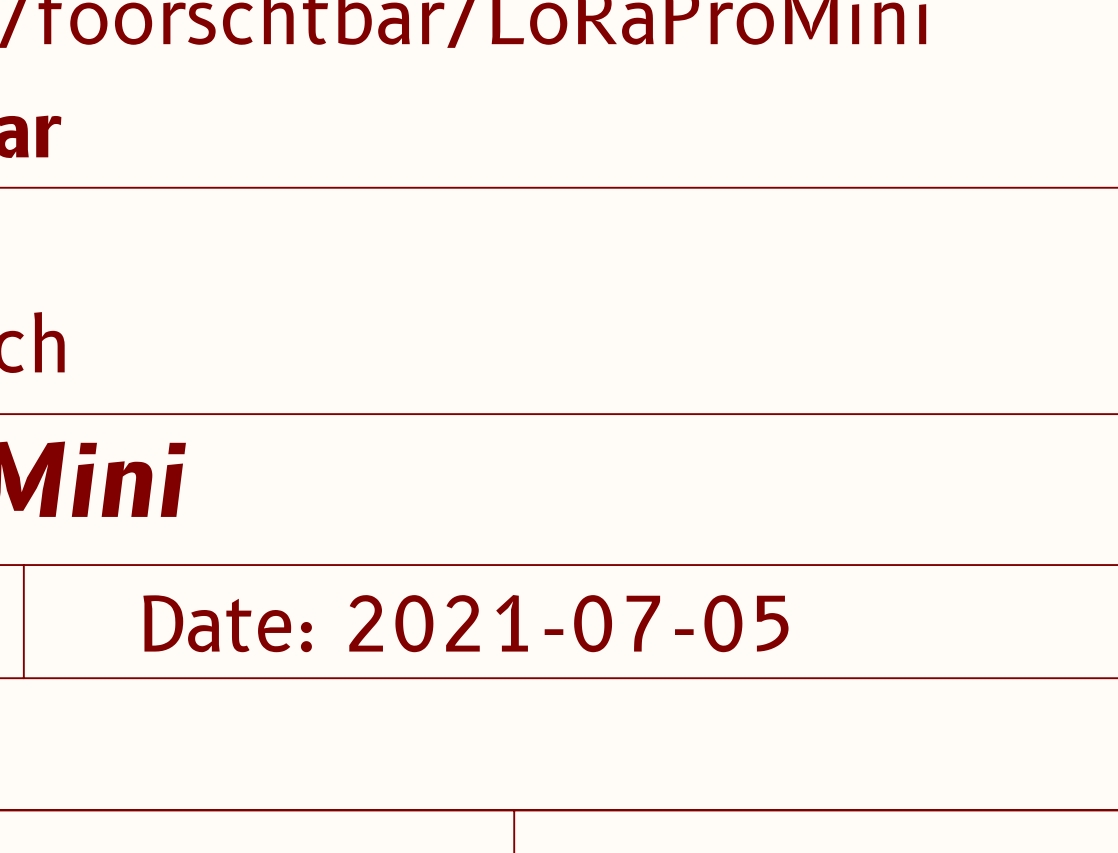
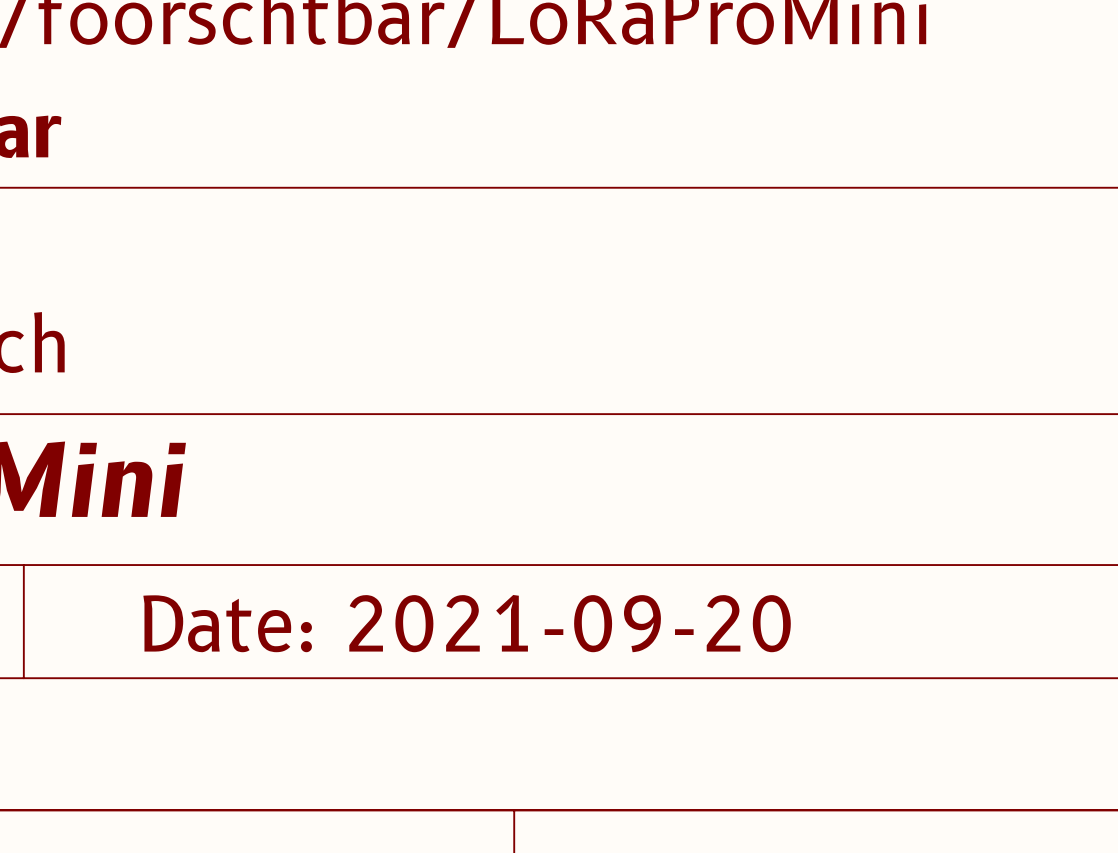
title block: Date: 2021-07-05 (465, 623) -> Date: 2021-09-20 (467, 623)

